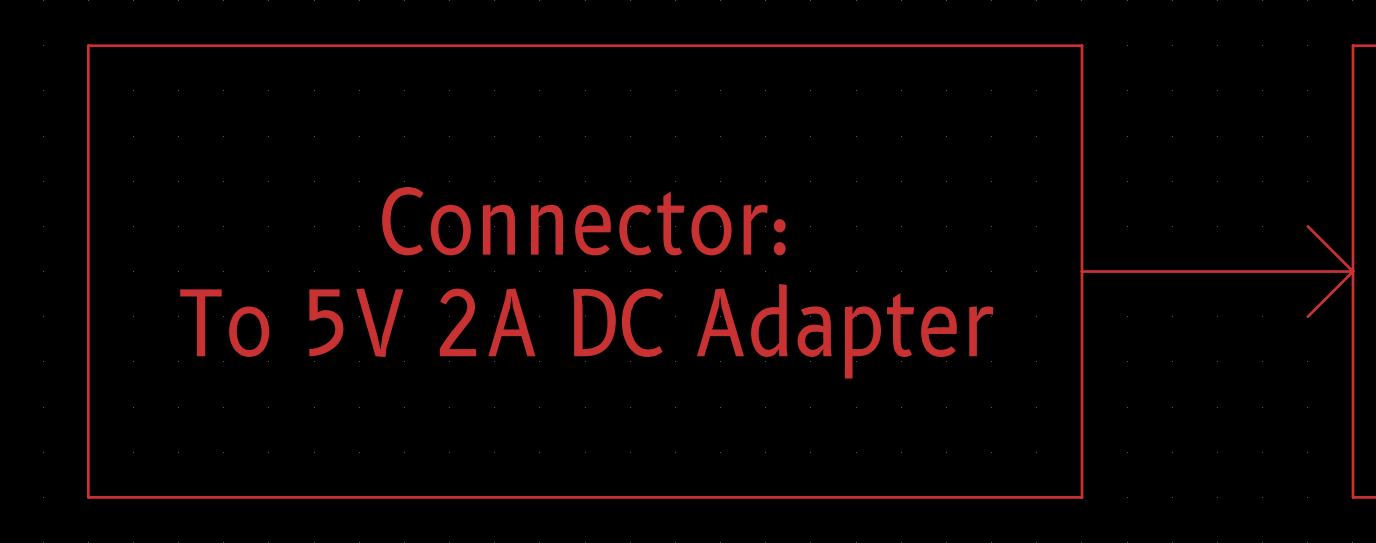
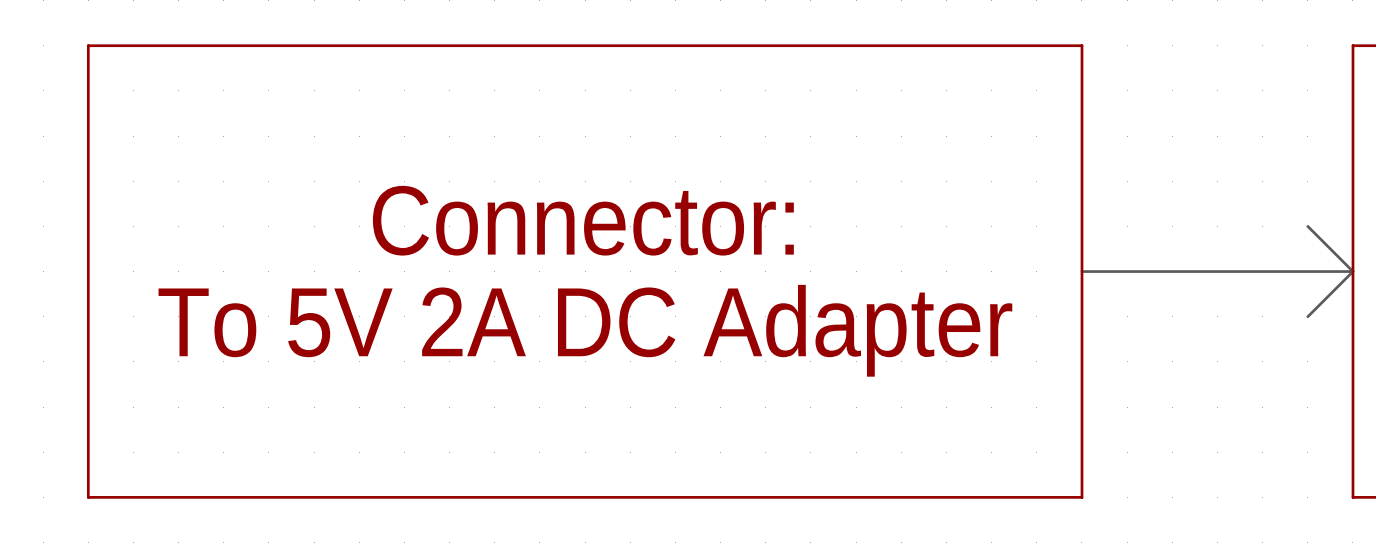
line: (1307, 226) (1352, 271) -> none
line: none -> (1307, 226) (1352, 271)
line: (1081, 271) (1352, 271) -> none
line: none -> (1081, 271) (1352, 271)
line: (1352, 271) (1307, 316) -> none
line: none -> (1352, 271) (1307, 316)

